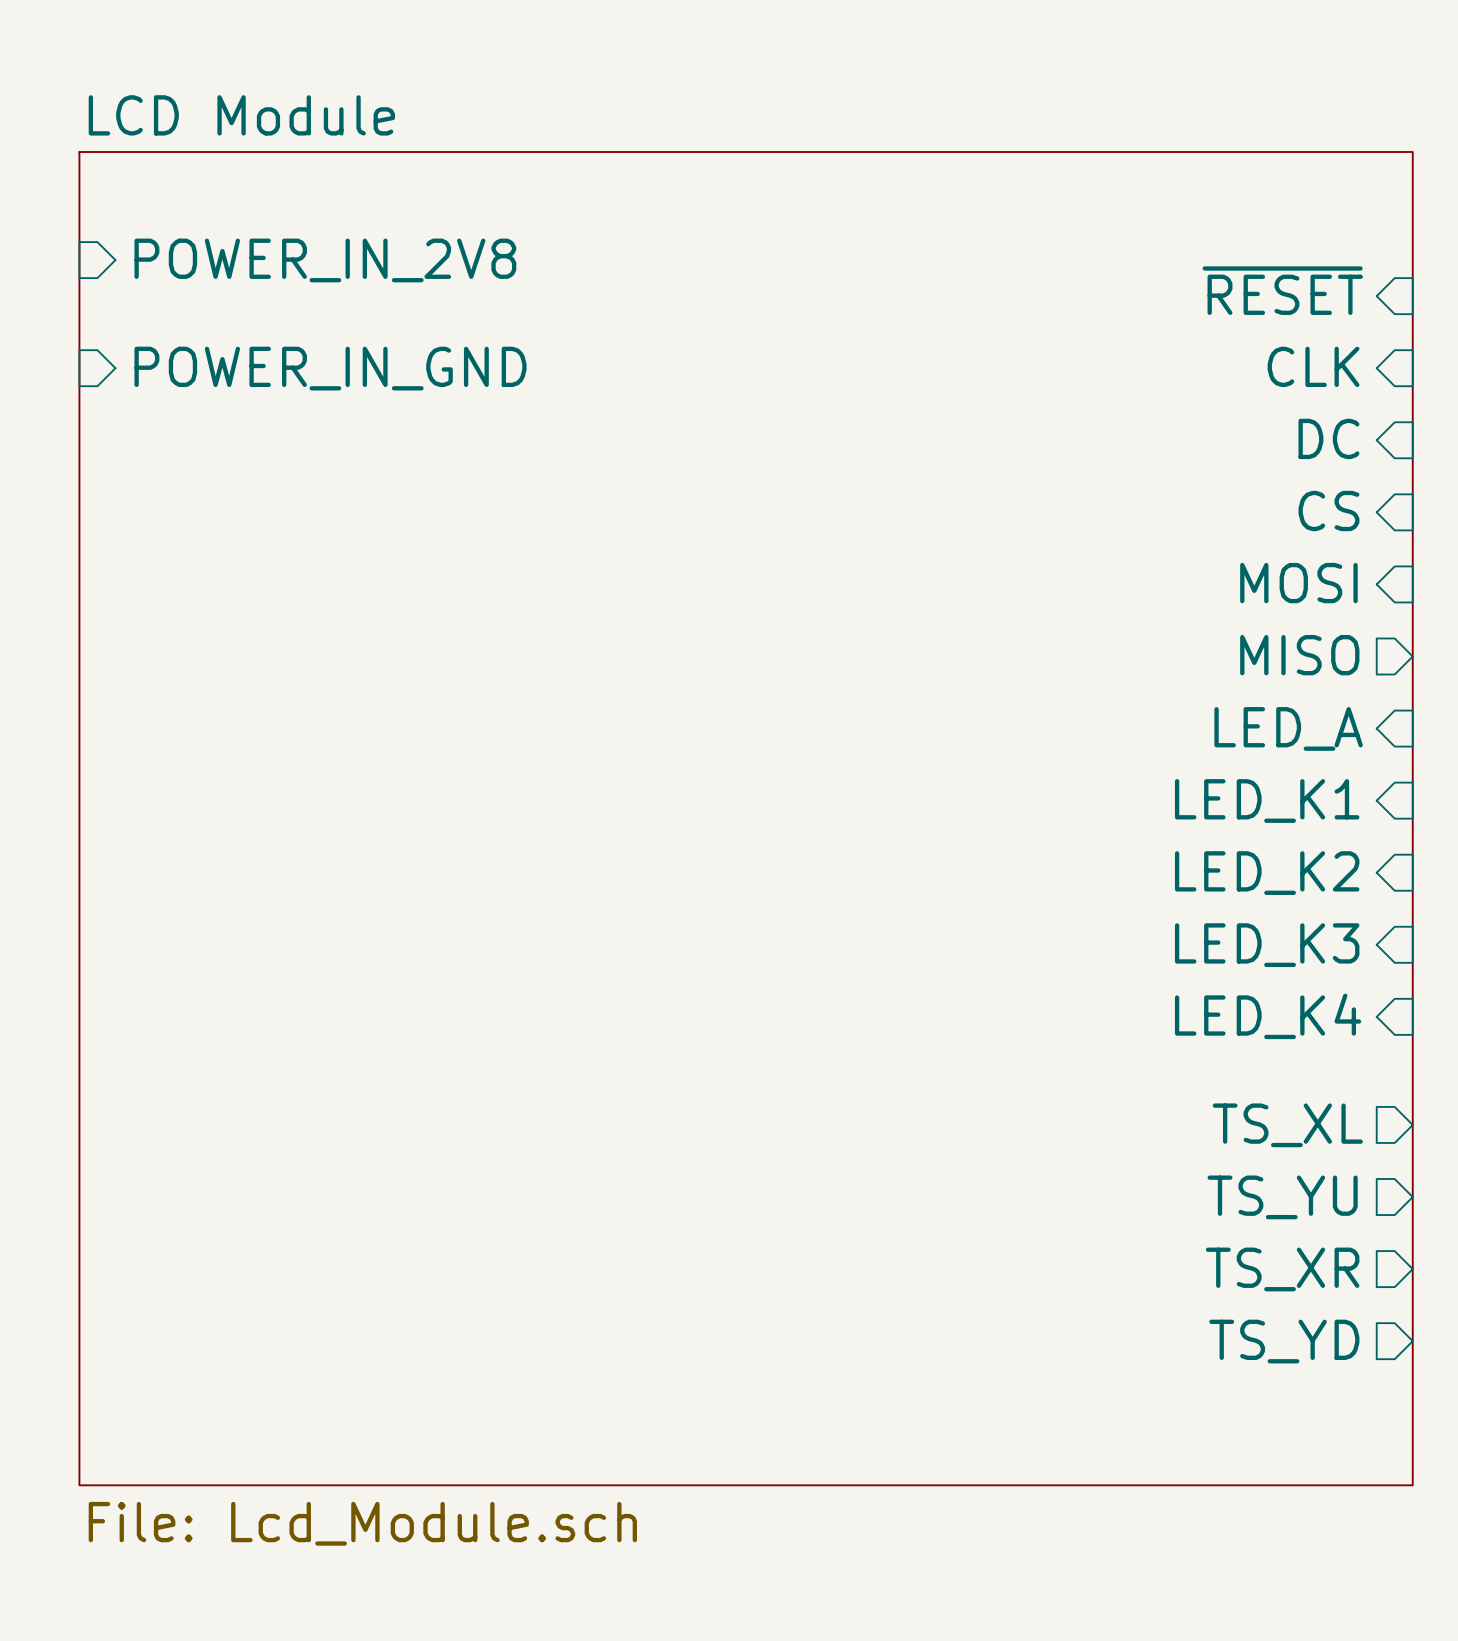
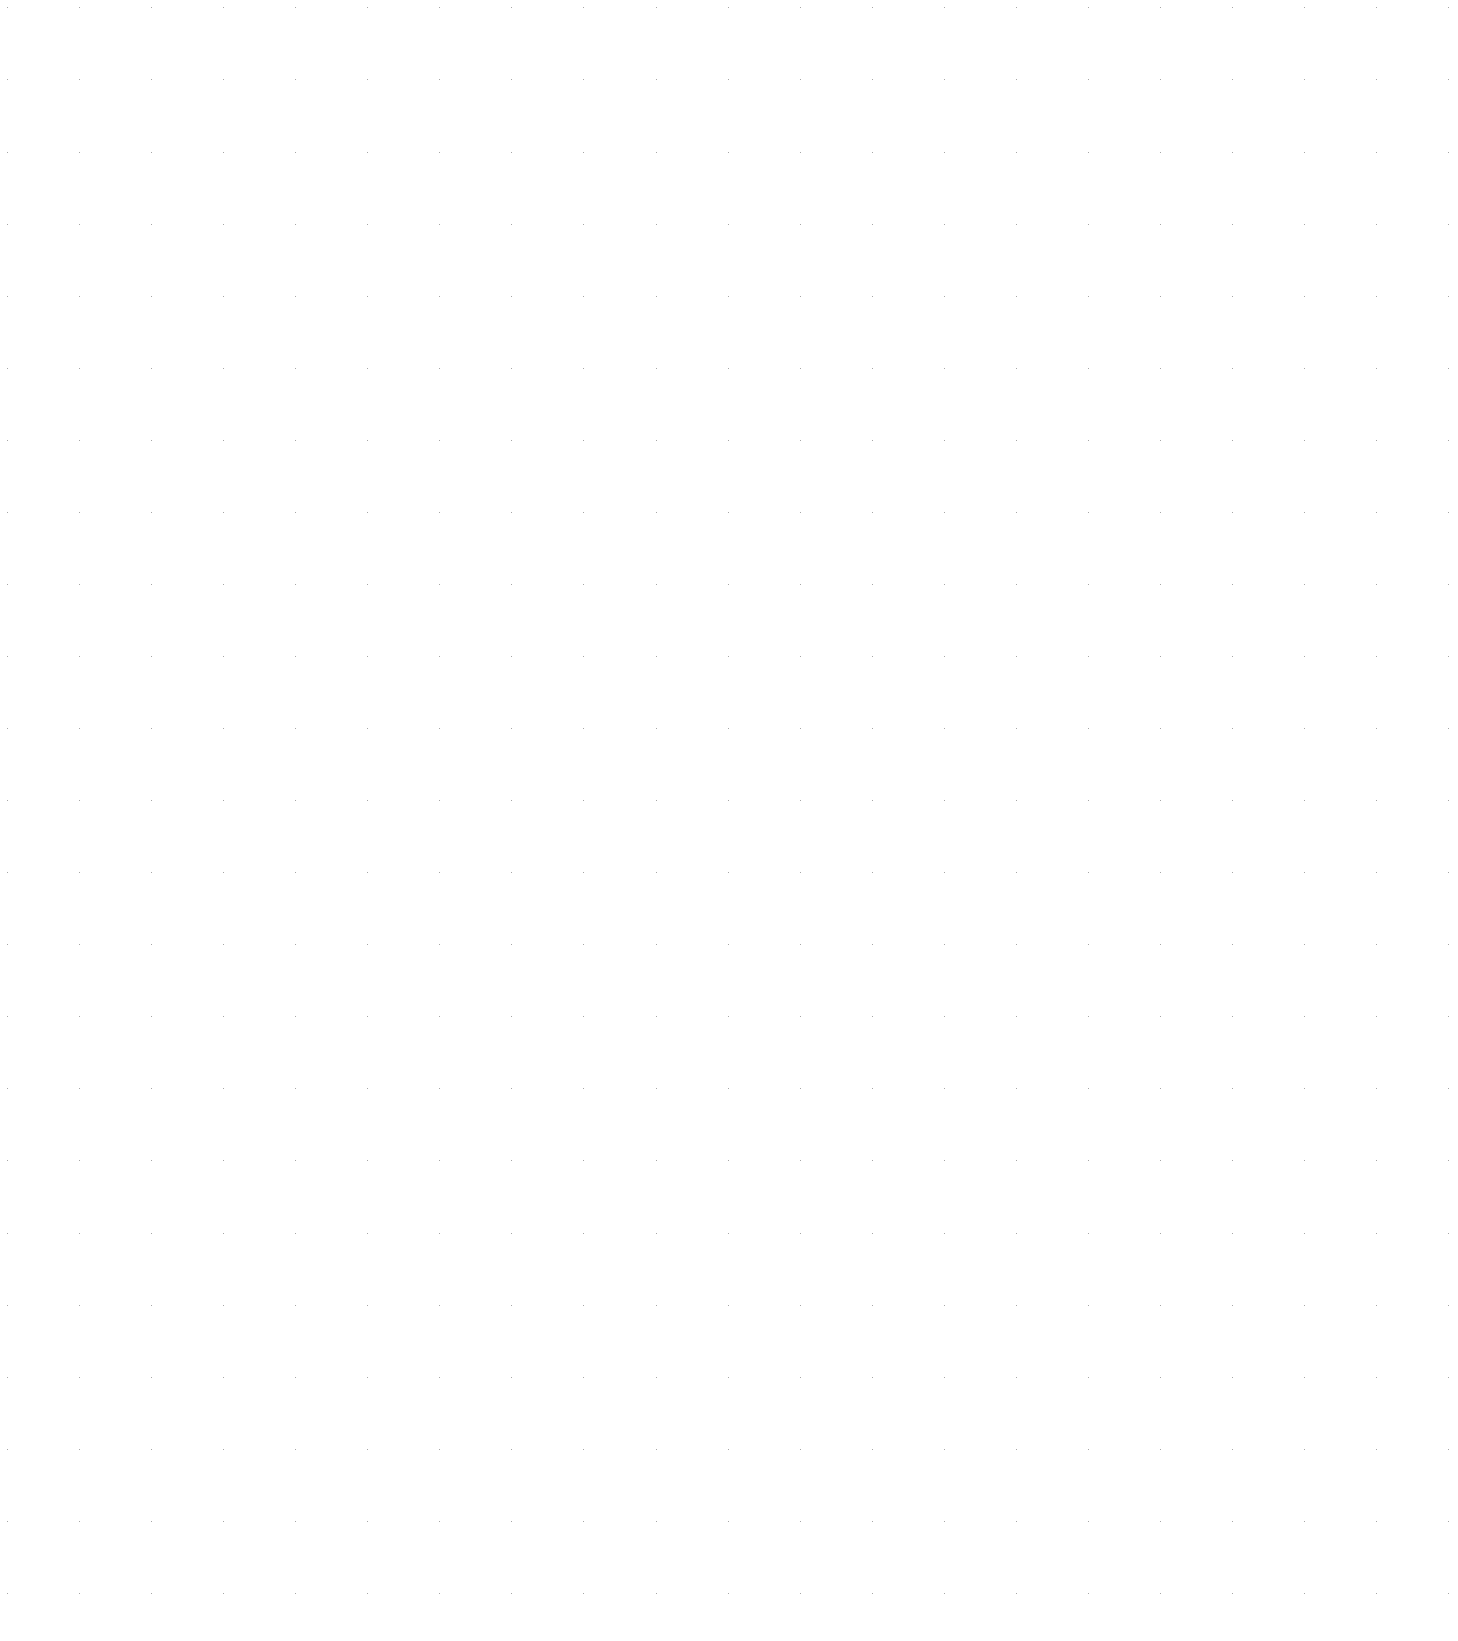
sheet pin: POWER_IN_2V8 (325, 260) -> none
sheet pin: ~{RESET} (1282, 290) -> none
sheet pin: CLK (1313, 366) -> none
sheet pin: POWER_IN_GND (330, 368) -> none
sheet pin: DC (1328, 438) -> none
sheet pin: CS (1328, 511) -> none
sheet pin: MOSI (1298, 583) -> none
sheet pin: MISO (1299, 655) -> none
sheet pin: LED_A (1288, 728) -> none
sheet pin: LED_K1 (1267, 801) -> none
sheet LCD Module: File: Lcd_Module.sch (746, 818) -> none
sheet pin: LED_K2 (1267, 873) -> none
sheet pin: LED_K3 (1267, 945) -> none
sheet pin: LED_K4 (1268, 1016) -> none
sheet pin: TS_XL (1287, 1125) -> none
sheet pin: TS_YU (1282, 1197) -> none
sheet pin: TS_XR (1282, 1269) -> none
sheet pin: TS_YD (1284, 1341) -> none

